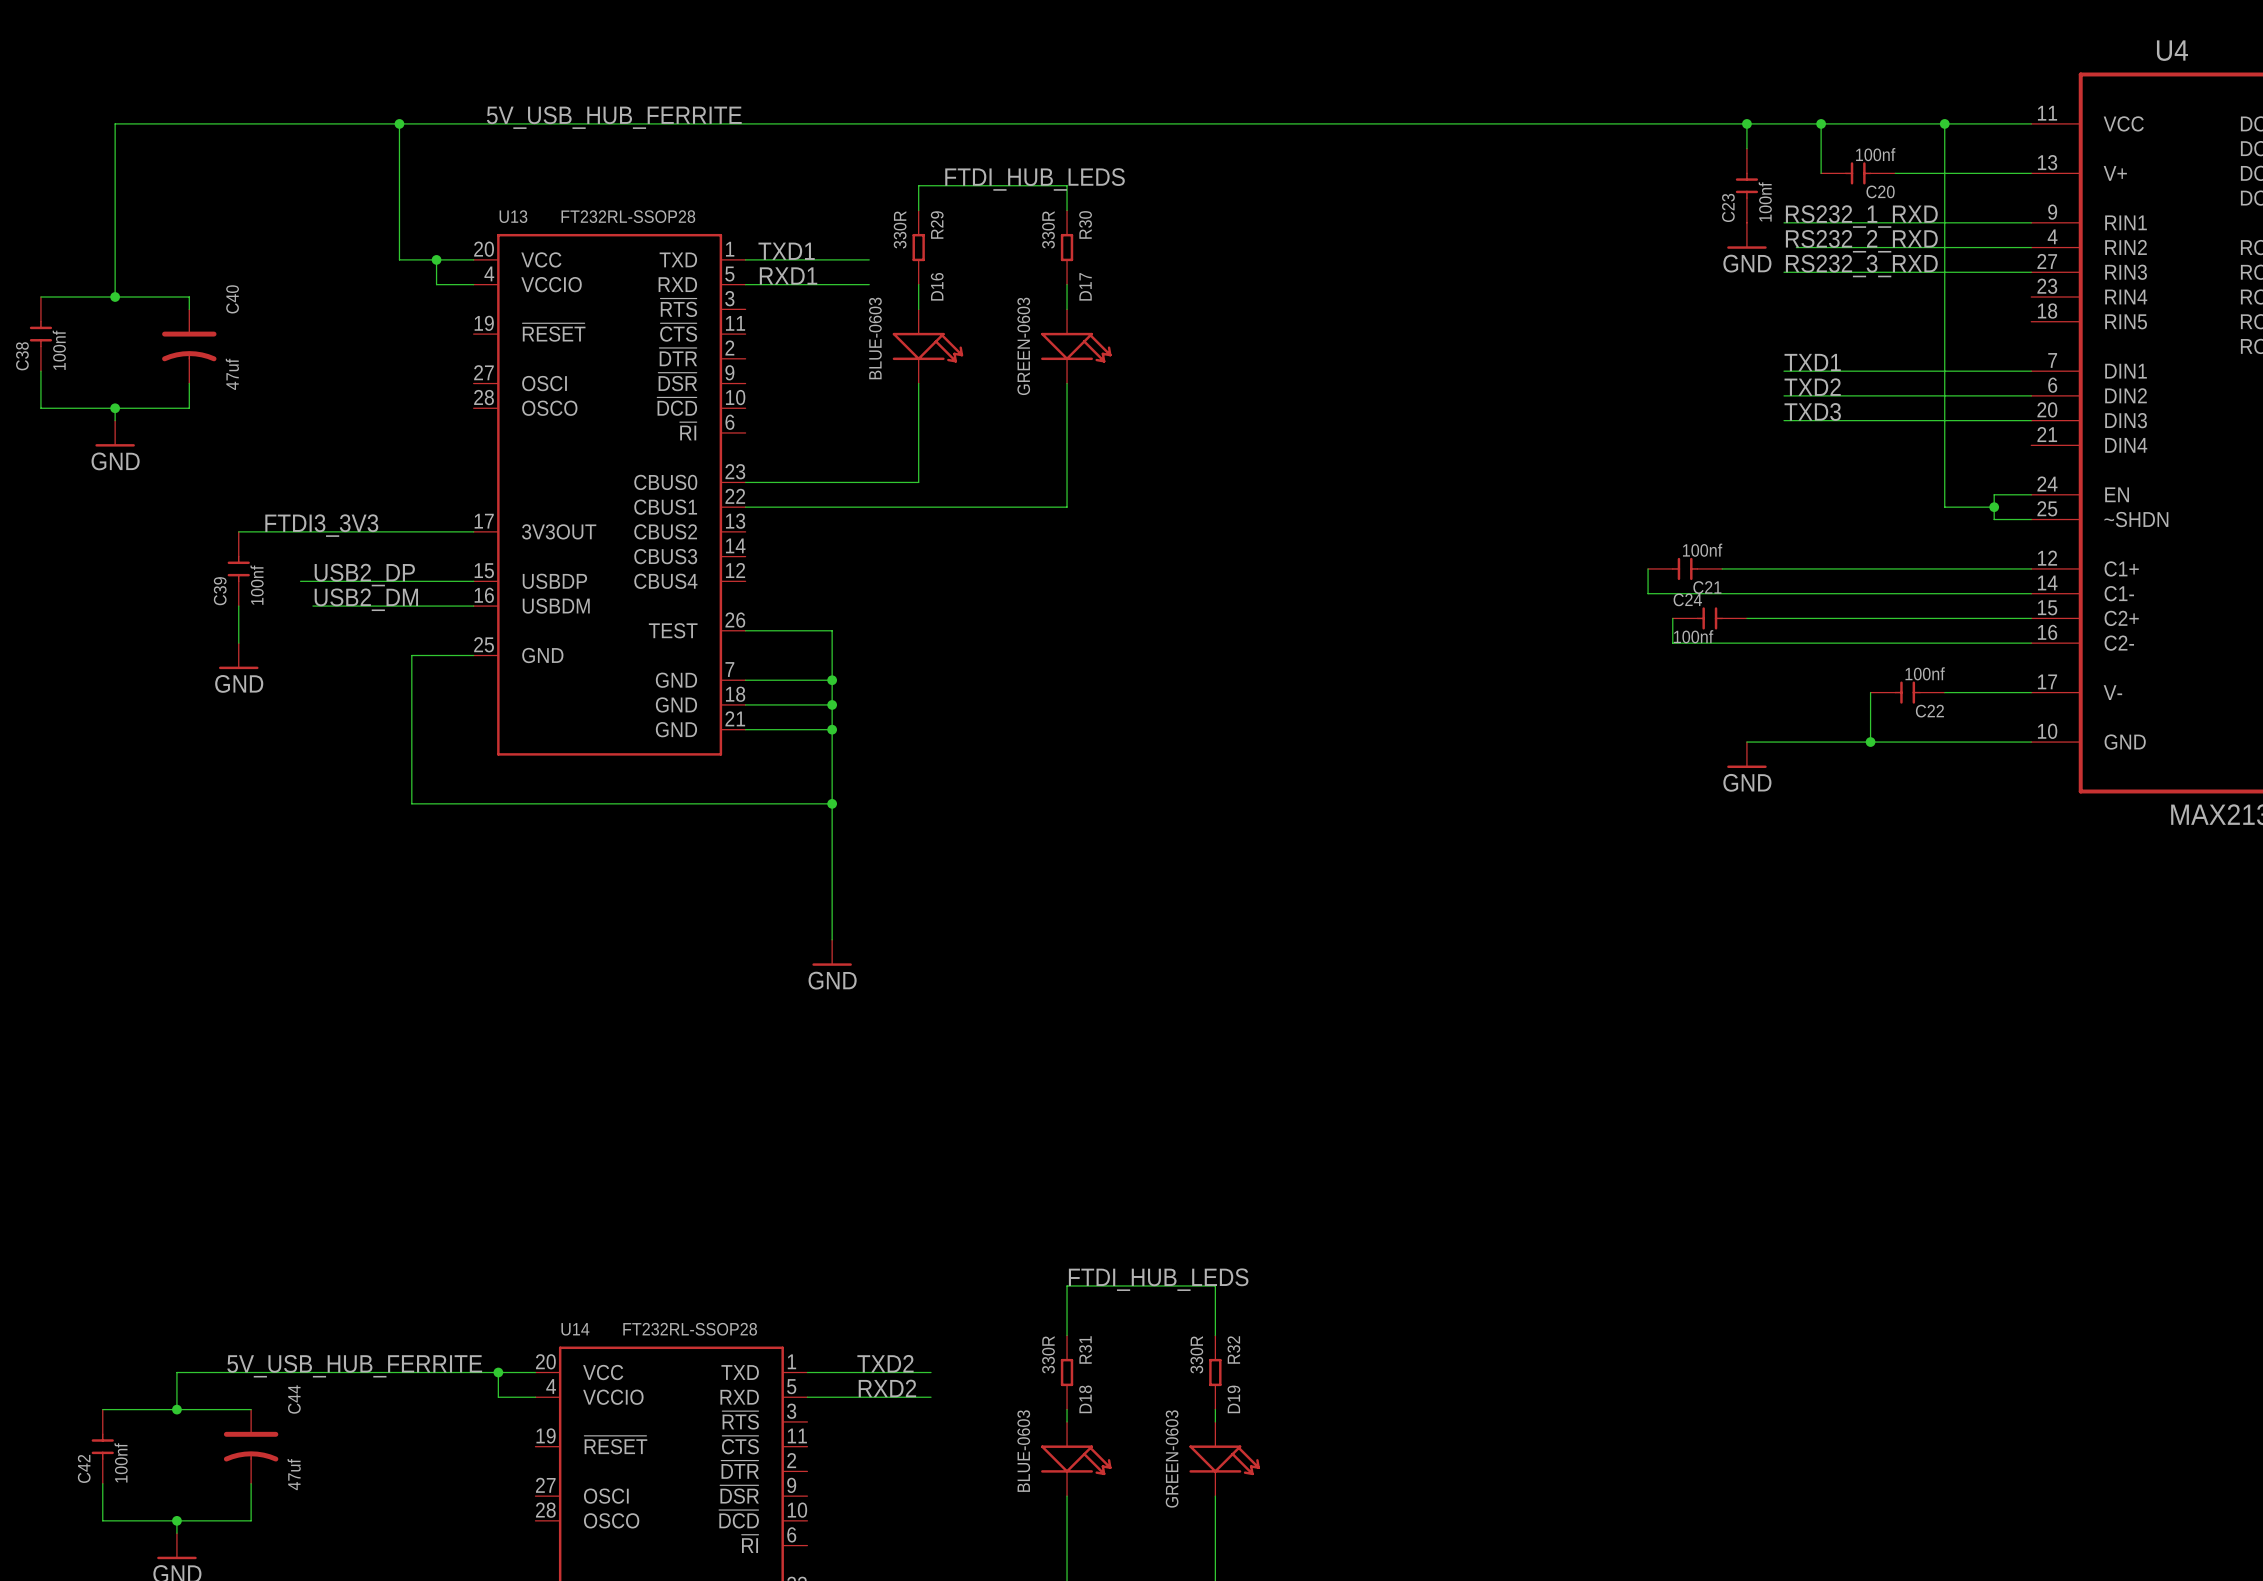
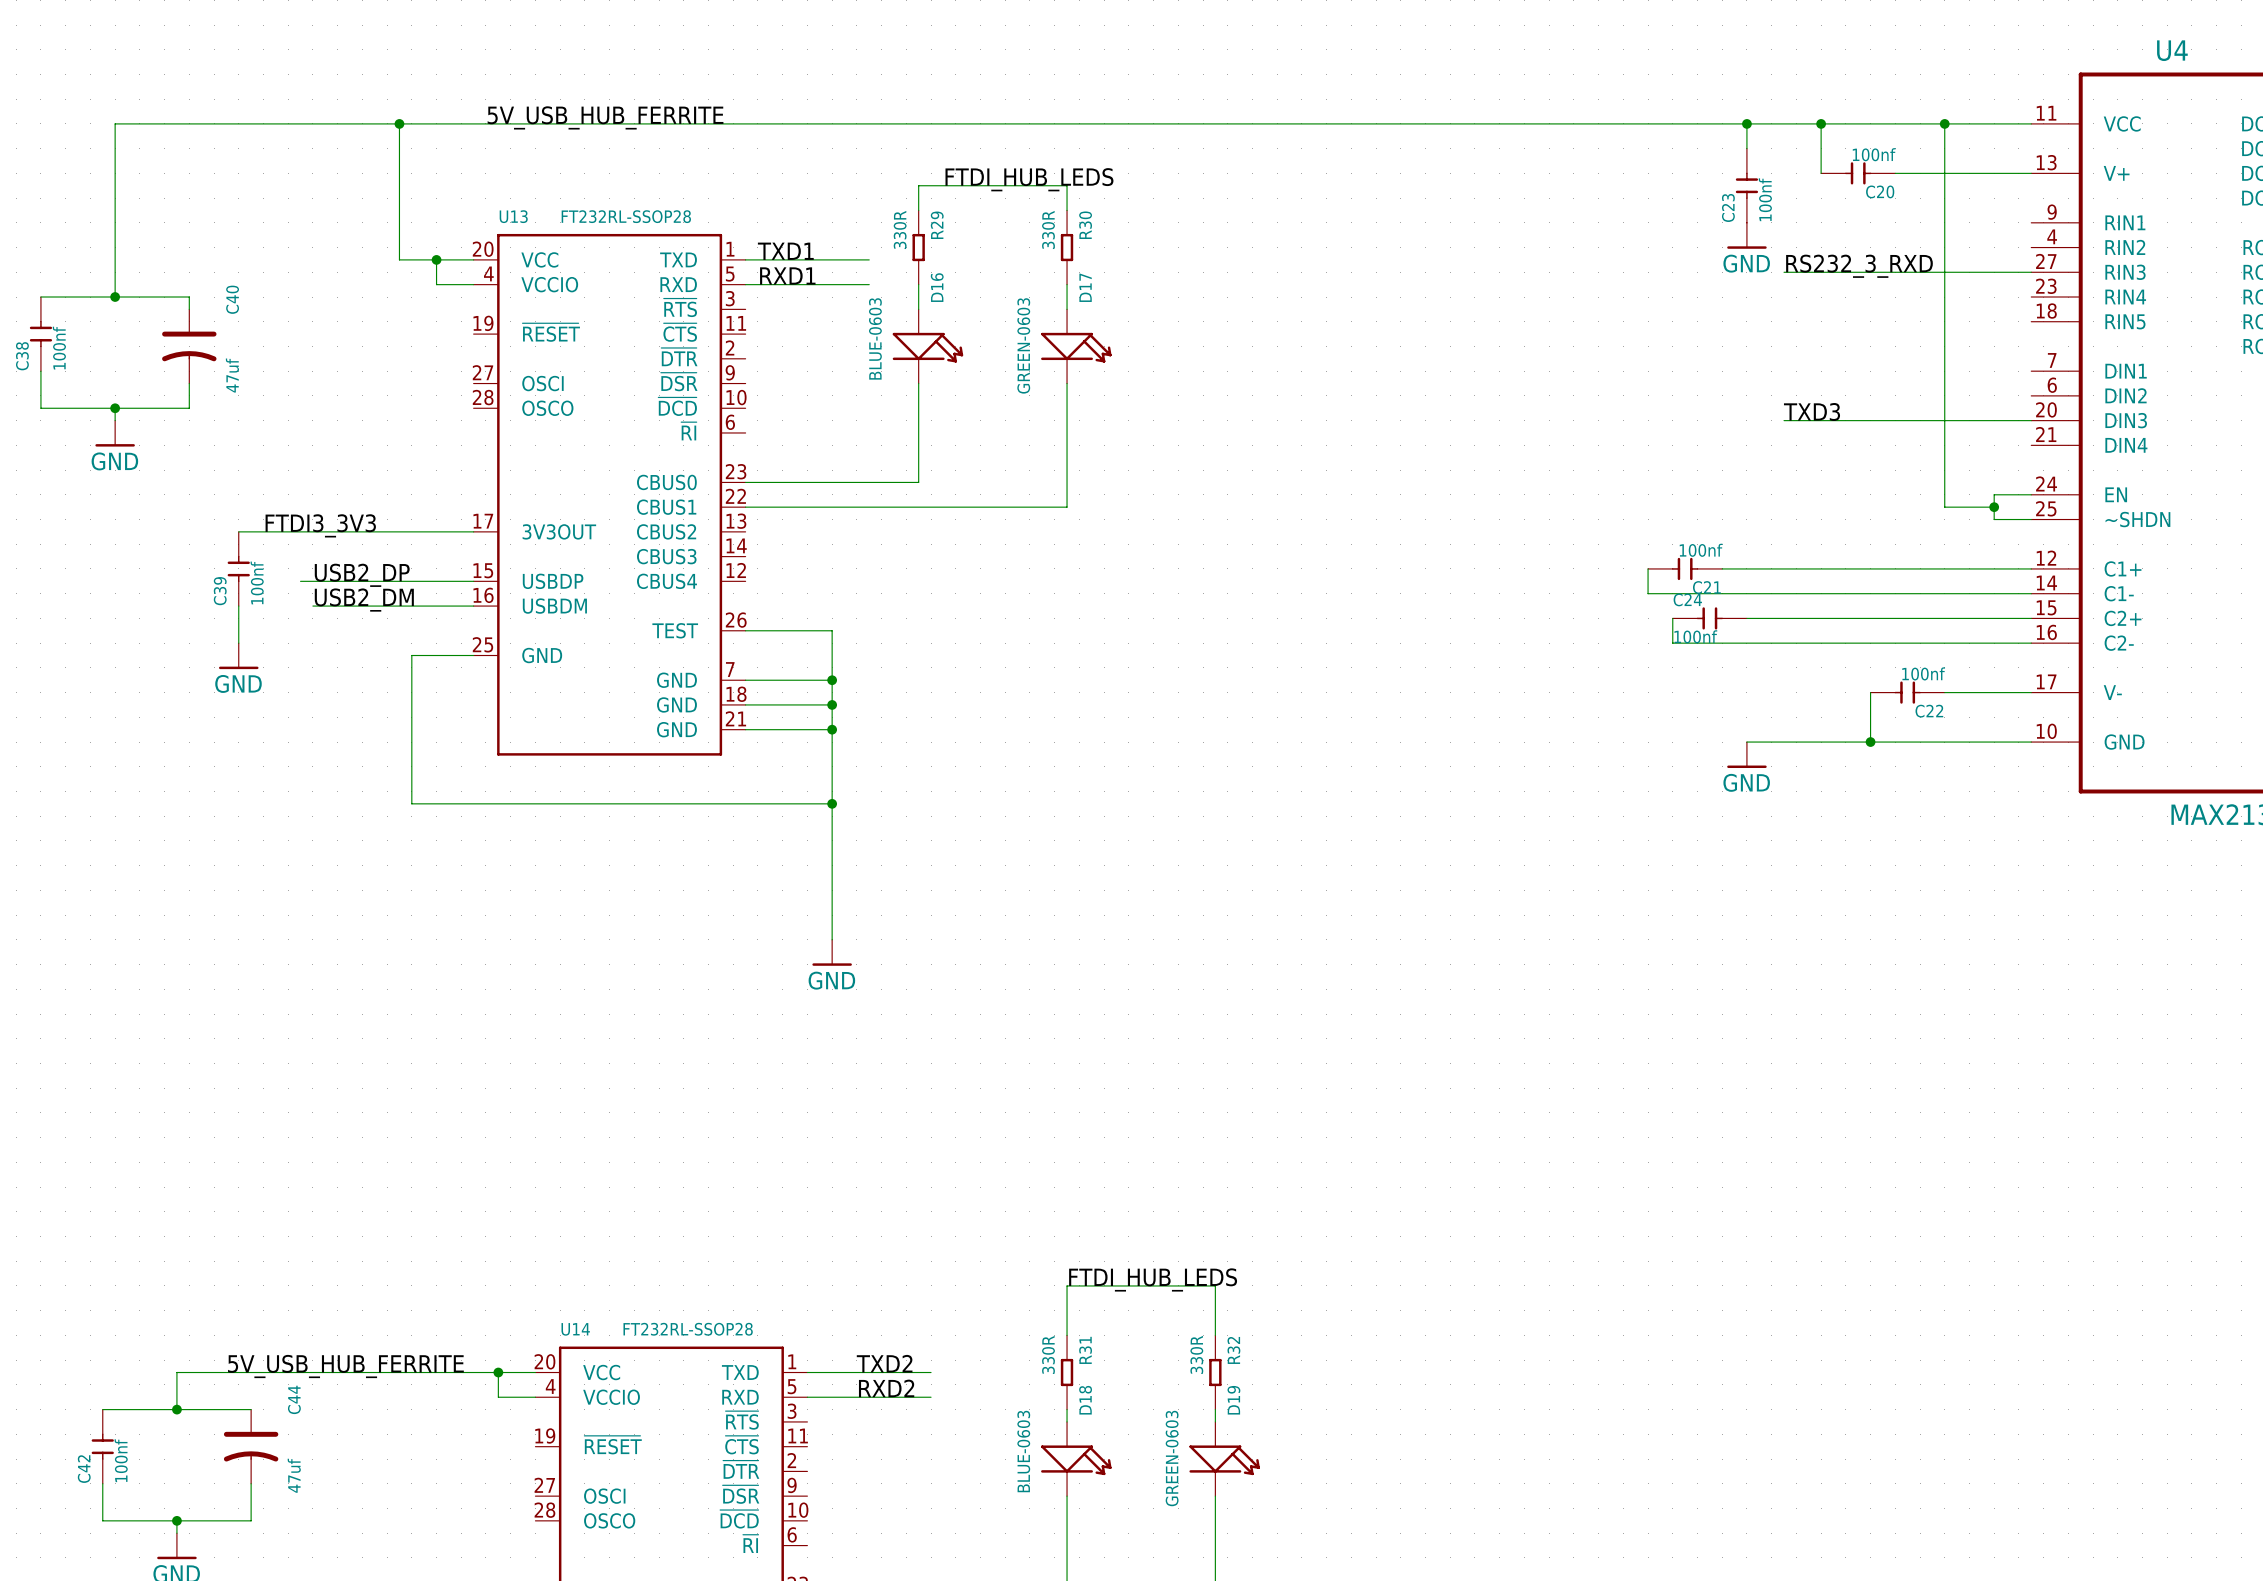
label: RS232_1_RXD (1861, 216) -> none
wire: (1784, 222) (2031, 222) -> none
label: RS232_2_RXD (1861, 241) -> none
wire: (1796, 247) (2031, 247) -> none
label: TXD1 (1812, 362) -> none
wire: (1784, 371) (2031, 371) -> none
label: TXD2 (1812, 387) -> none
wire: (1784, 395) (2031, 395) -> none

